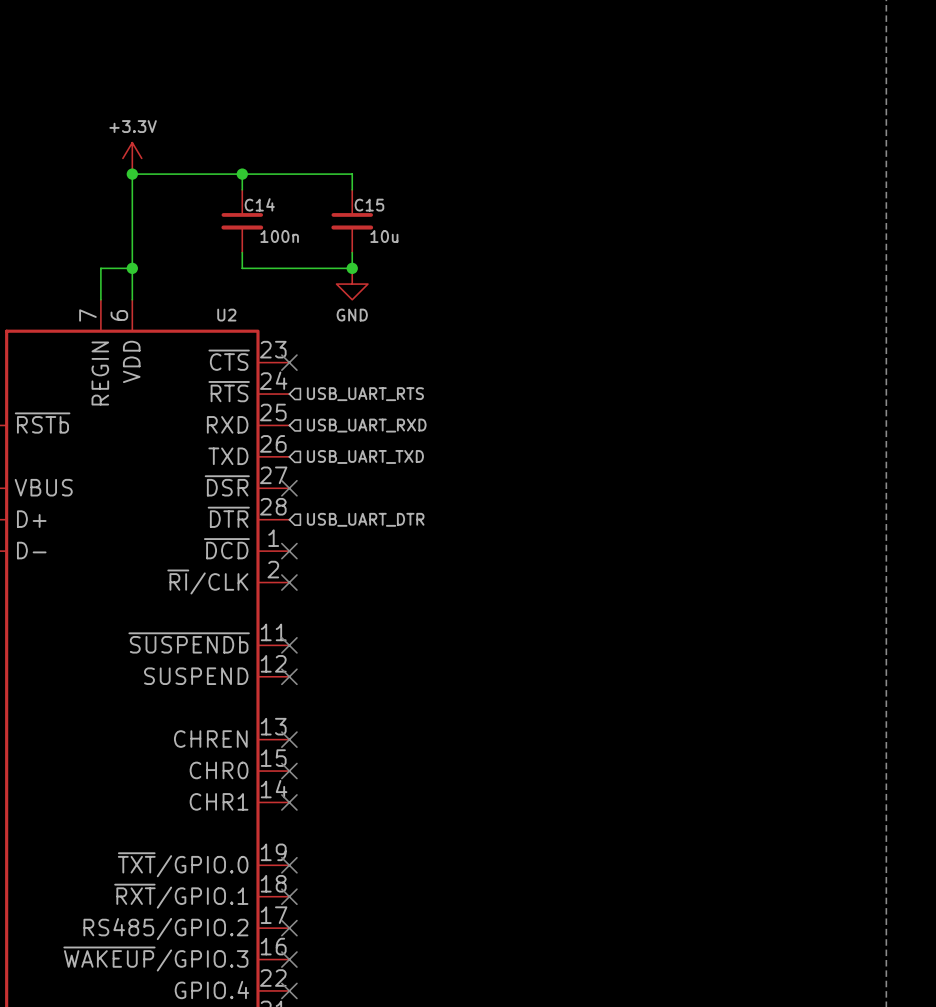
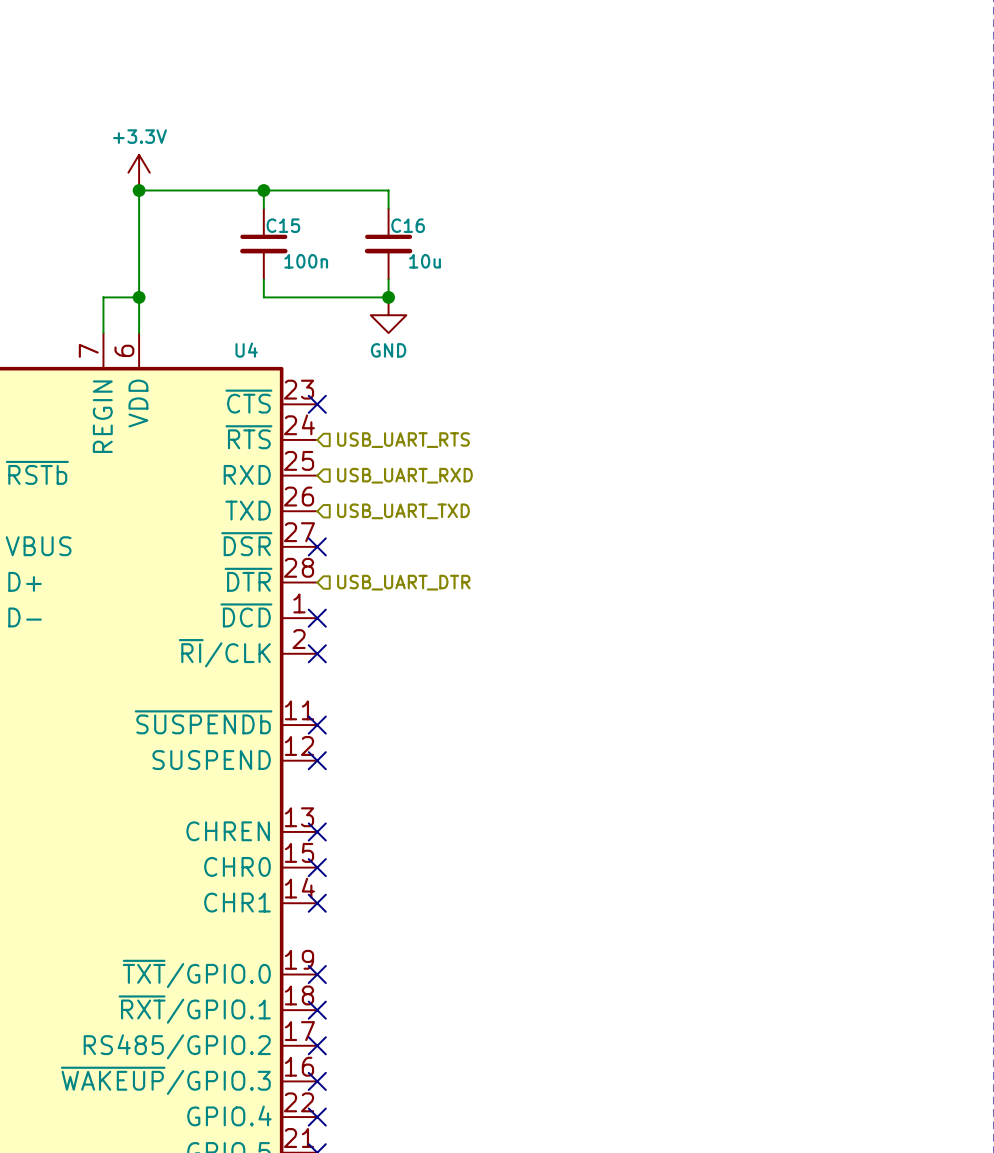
C14 name: C14 (259, 204) -> C15 (283, 225)
C15 name: C15 (369, 205) -> C16 (408, 225)
U2 name: U2 (226, 315) -> U4 (246, 350)

